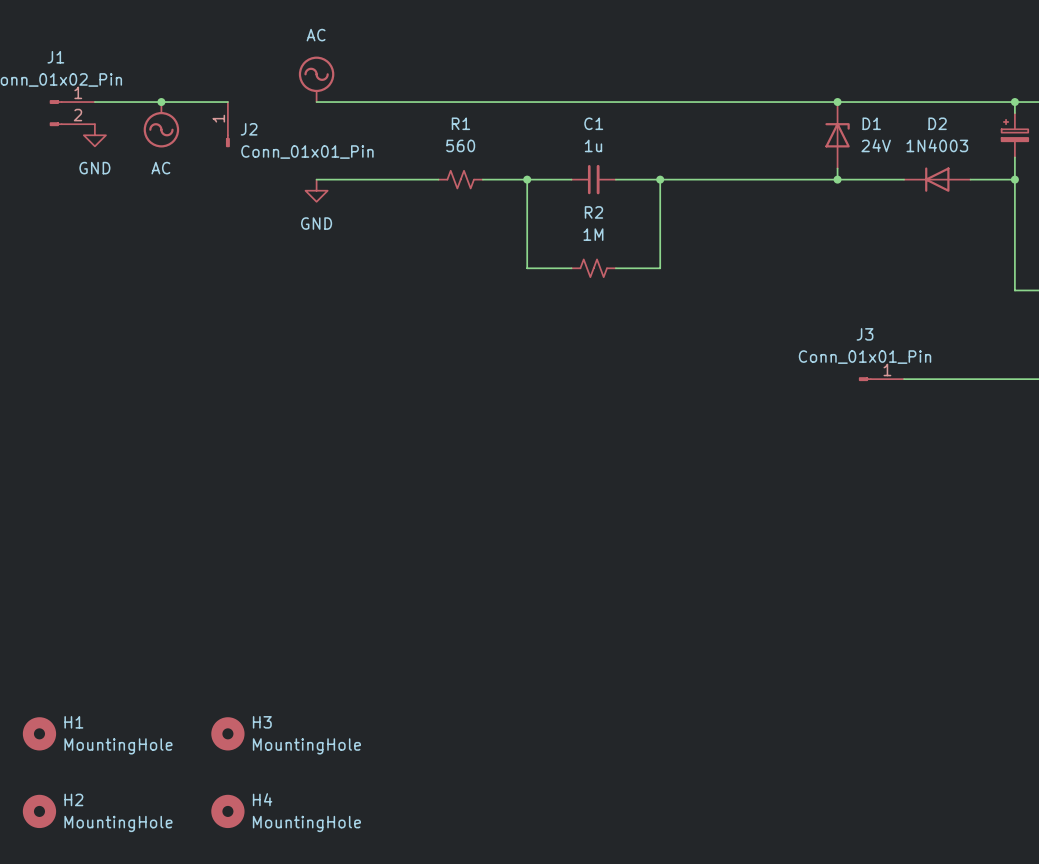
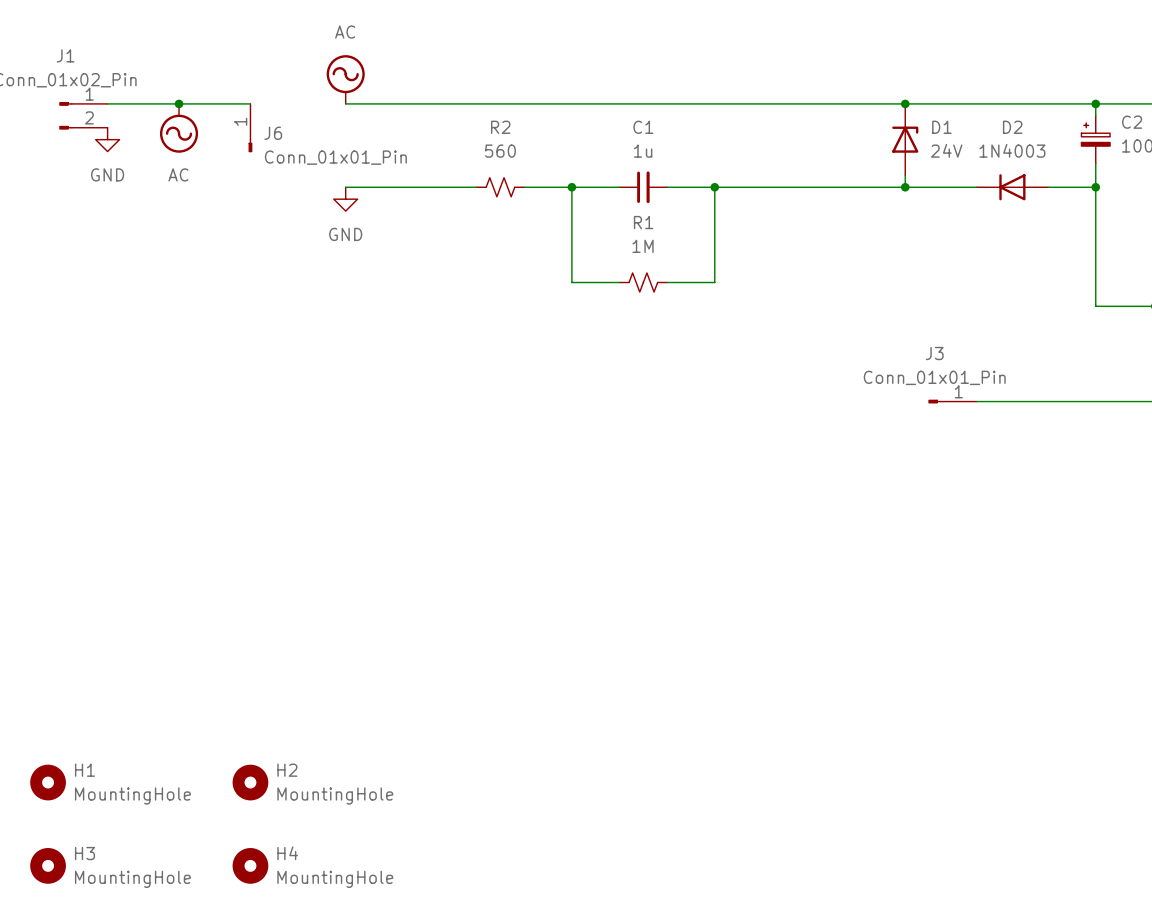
R1 name: R1 (460, 123) -> R2 (500, 127)
J2 name: J2 (249, 129) -> J6 (273, 133)
R2 name: R2 (593, 212) -> R1 (643, 222)
H3 name: H3 (262, 722) -> H2 (287, 770)
H2 name: H2 (73, 799) -> H3 (85, 853)

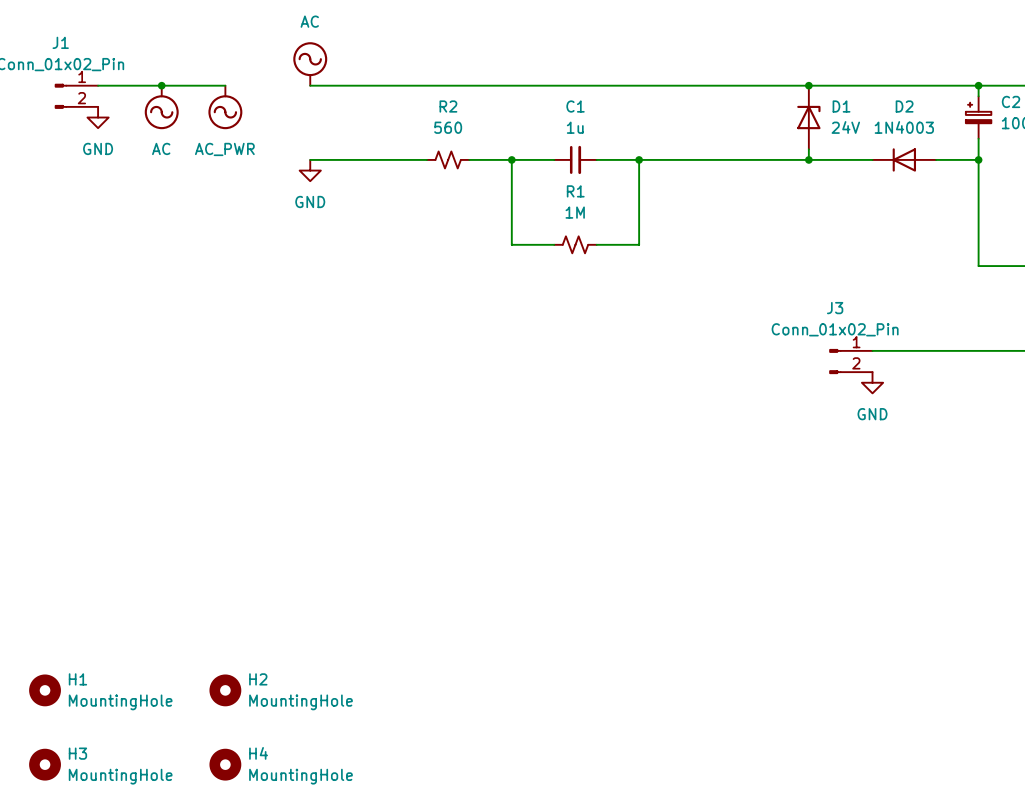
J6: Conn_01x01_Pin (250, 128) -> none
power symbol: none -> AC_PWR (225, 107)
J3 value: Conn_01x01_Pin (934, 377) -> Conn_01x02_Pin (835, 329)
J3 symbol: [928, 399, 977, 404] -> [829, 349, 873, 374]
power symbol: none -> GND (872, 382)

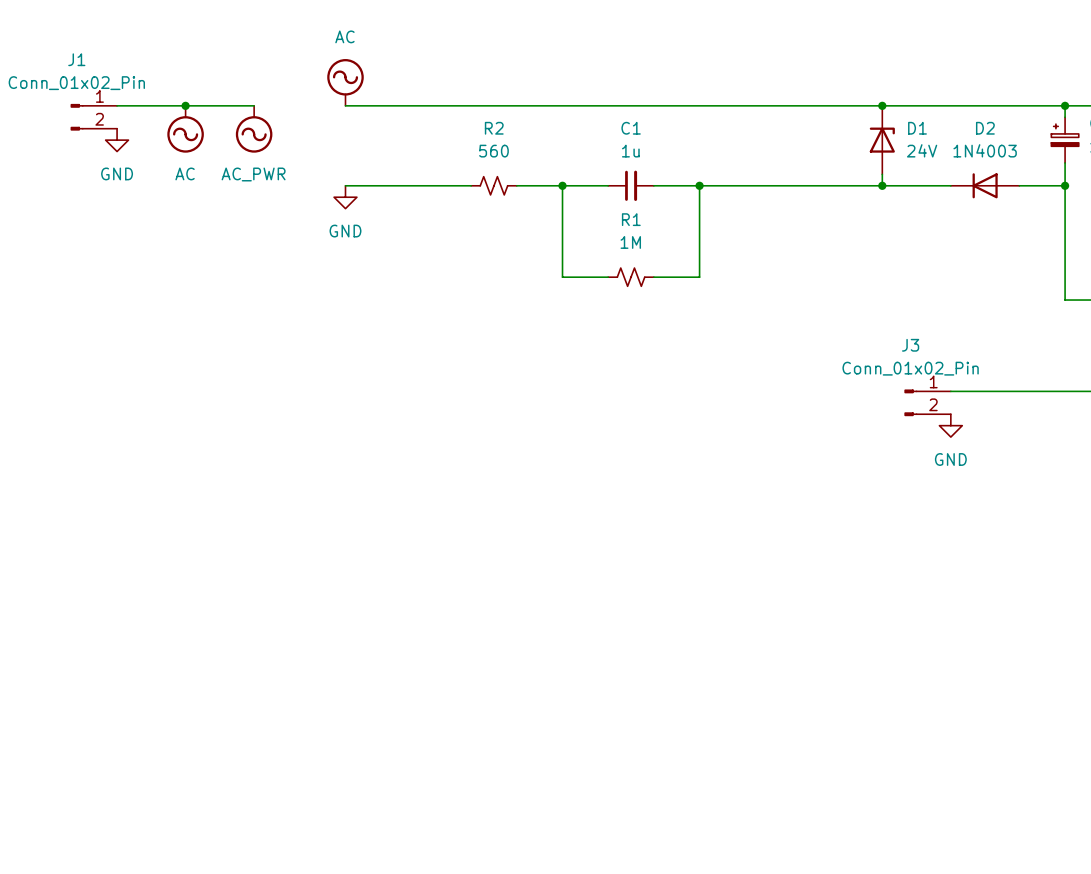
H1: MountingHole (45, 690) -> none
H2: MountingHole (225, 690) -> none
H3: MountingHole (45, 764) -> none
H4: MountingHole (225, 764) -> none

